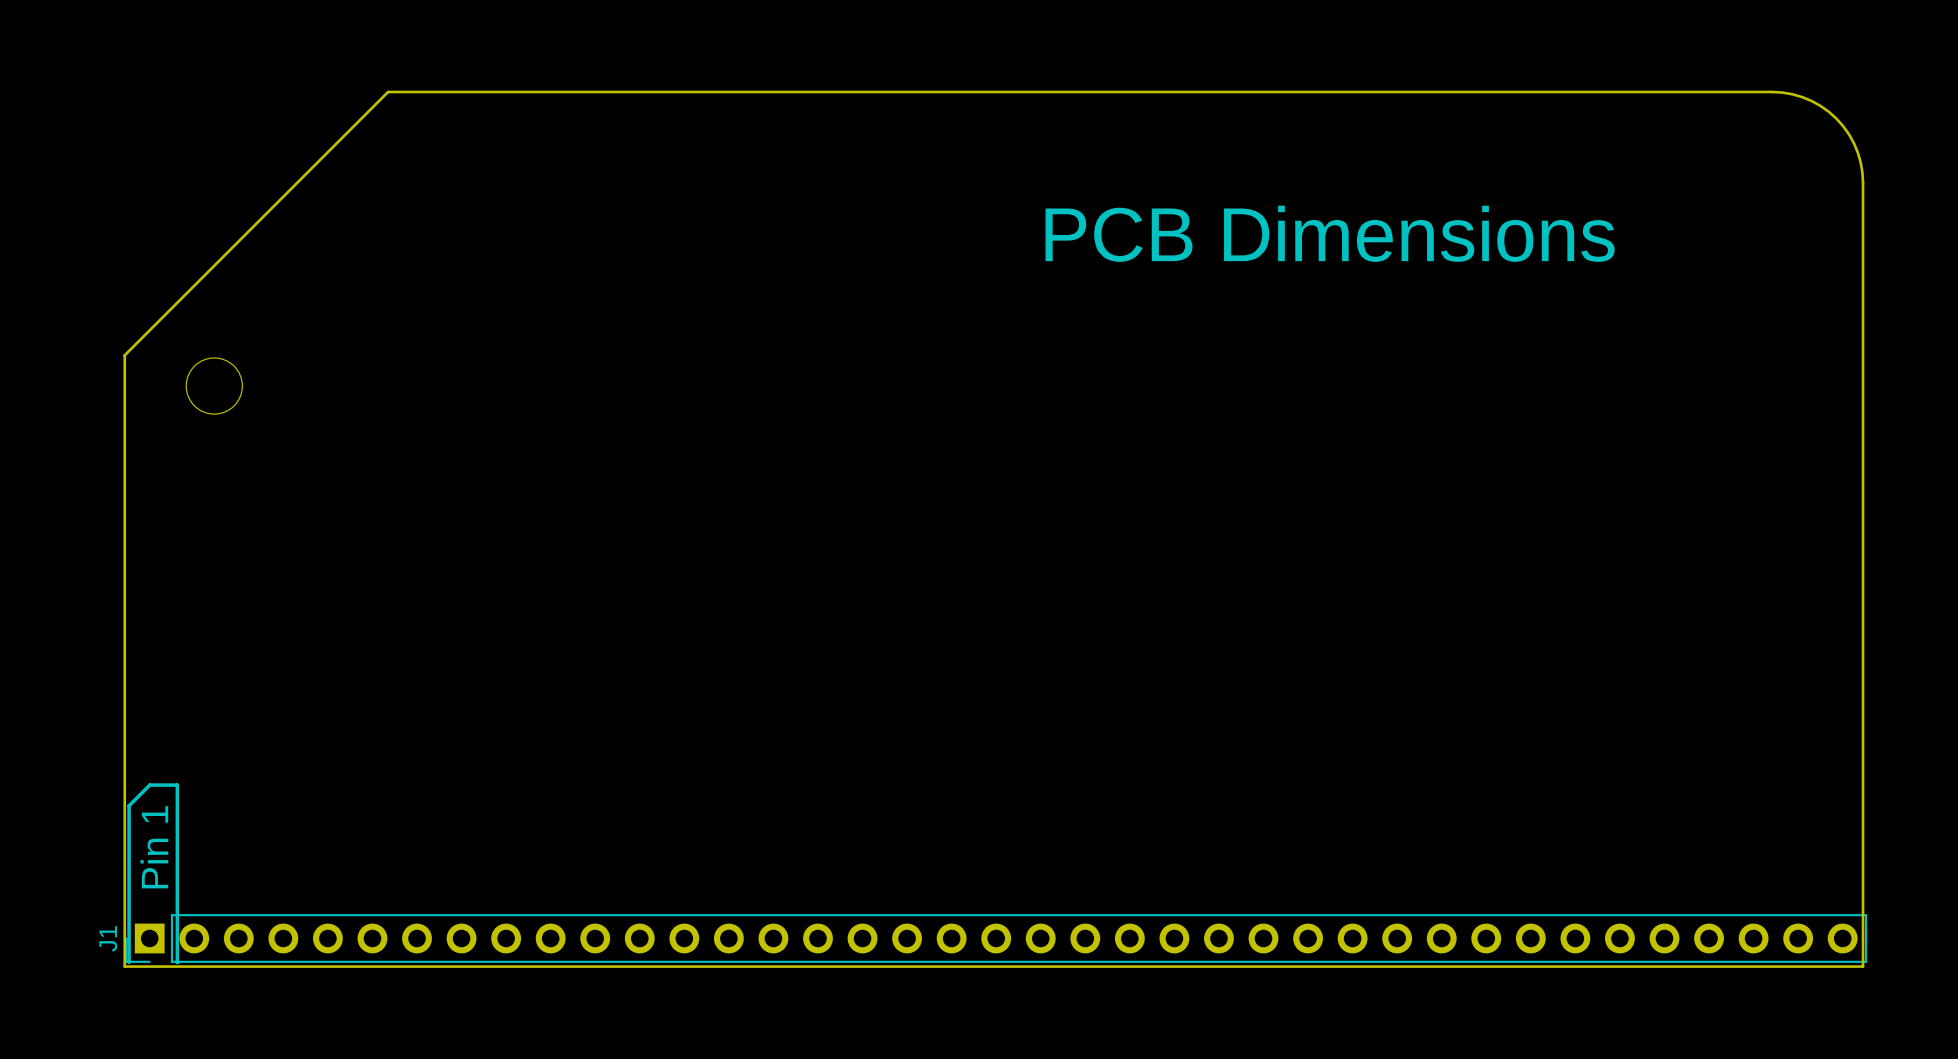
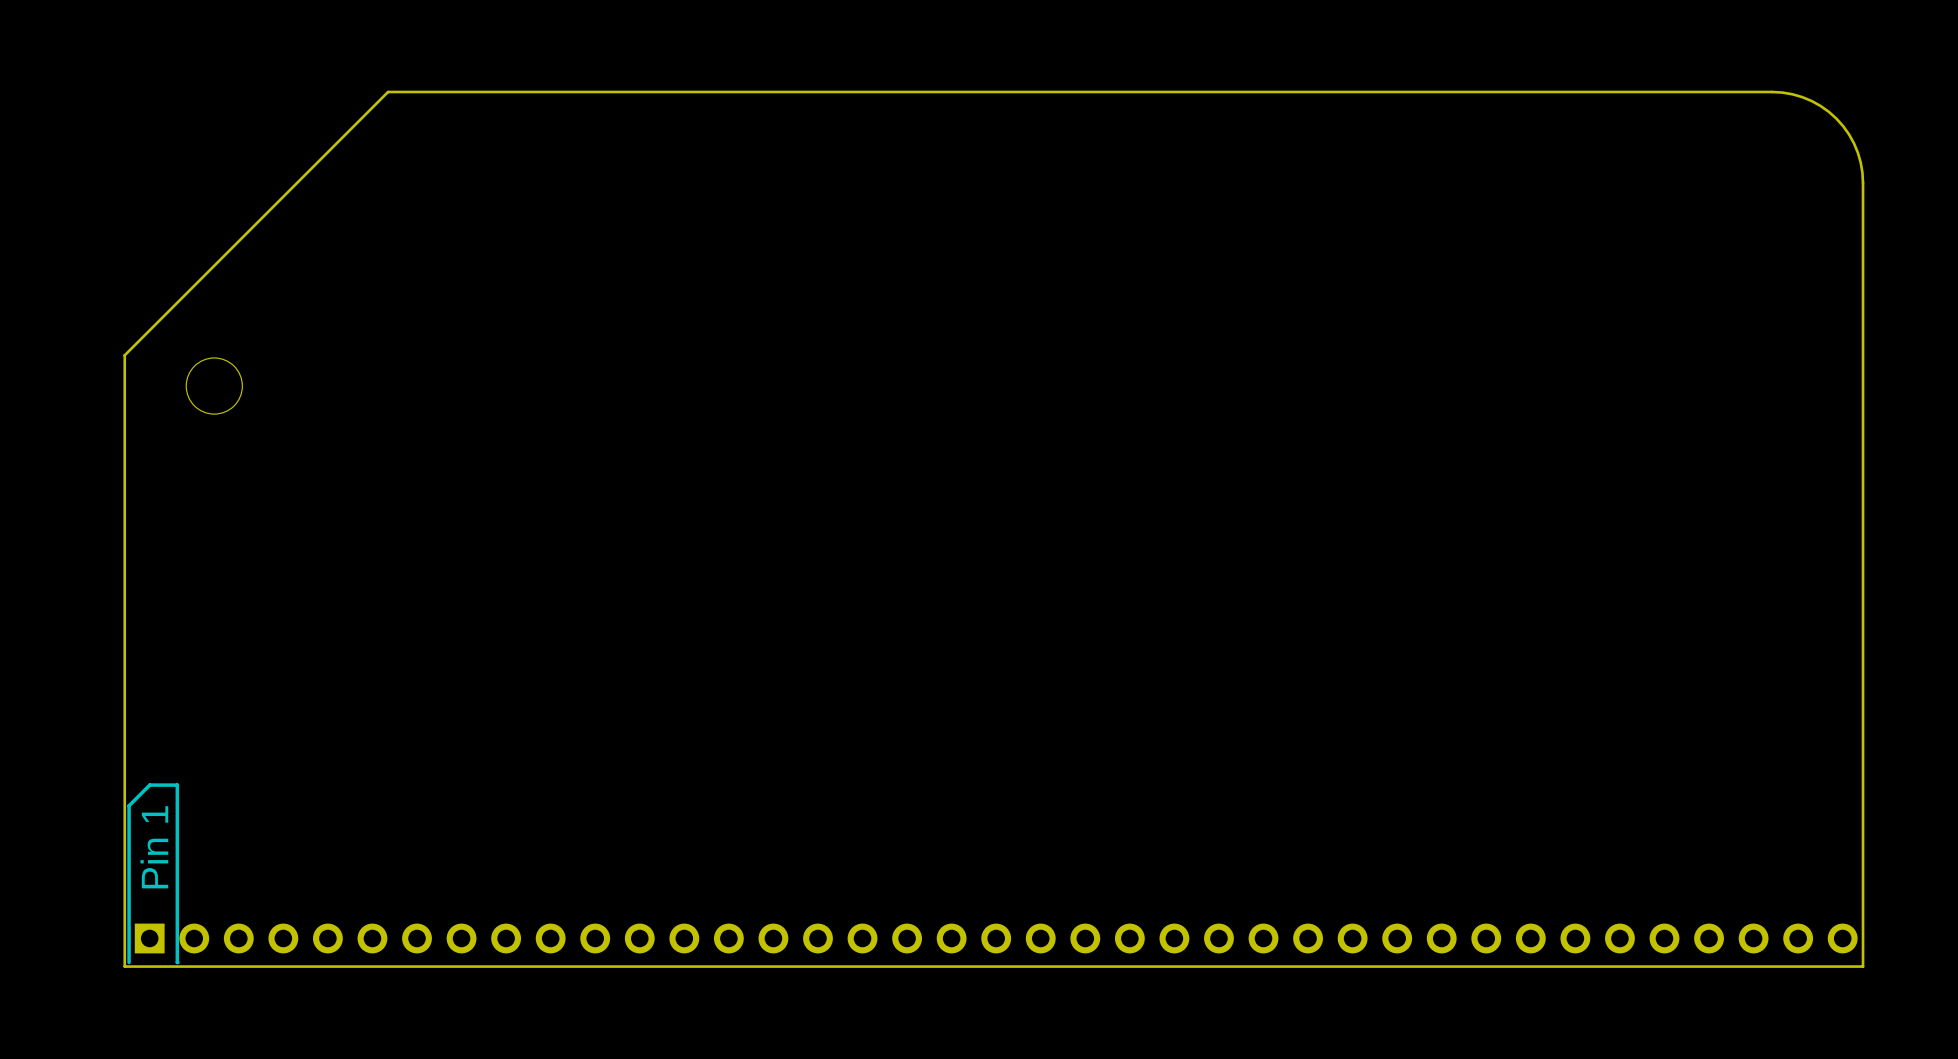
text: PCB Dimensions (1330, 233) -> none
J1: (996, 938) -> none

